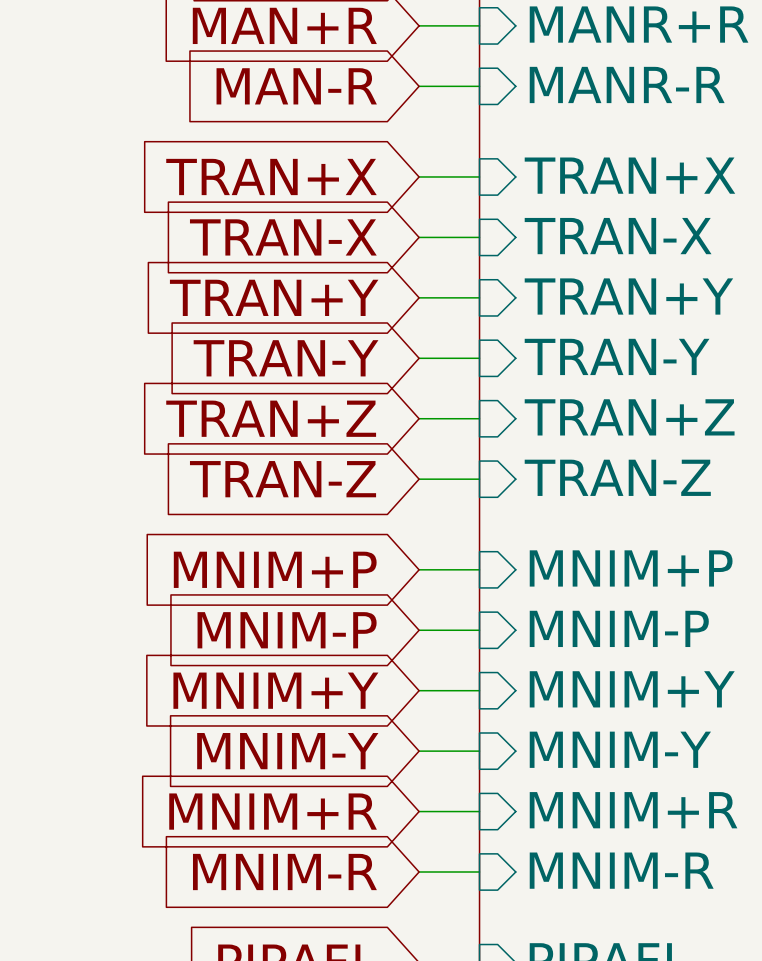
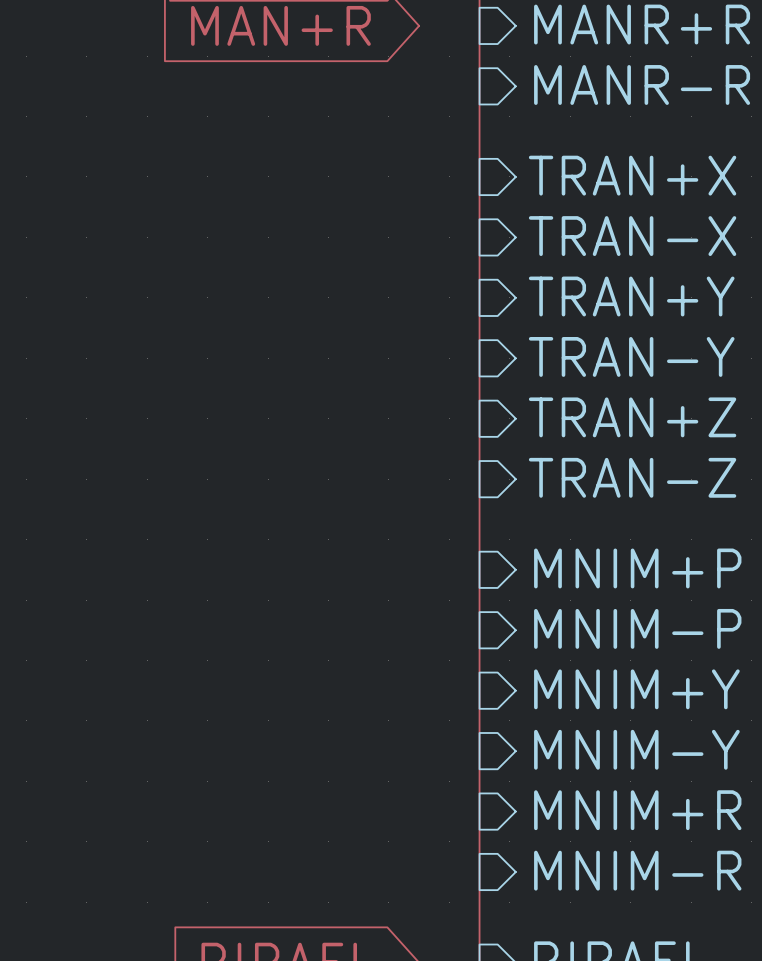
wire: (419, 25) (479, 25) -> none
global label: MAN-R (296, 86) -> none
wire: (419, 86) (479, 86) -> none
global label: TRAN+X (271, 176) -> none
wire: (419, 176) (479, 176) -> none
global label: TRAN-X (283, 237) -> none
wire: (419, 237) (479, 237) -> none
global label: TRAN+Y (274, 297) -> none
wire: (419, 297) (479, 297) -> none
global label: TRAN-Y (286, 358) -> none
wire: (419, 358) (479, 358) -> none
global label: TRAN+Z (271, 418) -> none
wire: (419, 418) (479, 418) -> none
global label: TRAN-Z (283, 479) -> none
wire: (419, 479) (479, 479) -> none
global label: MNIM+P (275, 569) -> none
wire: (419, 569) (479, 569) -> none
global label: MNIM-P (287, 630) -> none
wire: (419, 630) (479, 630) -> none
global label: MNIM+Y (275, 690) -> none
wire: (419, 690) (479, 690) -> none
global label: MNIM-Y (287, 751) -> none
wire: (419, 751) (479, 751) -> none
global label: MNIM+R (273, 811) -> none
wire: (419, 811) (479, 811) -> none
global label: MNIM-R (284, 871) -> none
wire: (419, 871) (479, 871) -> none

